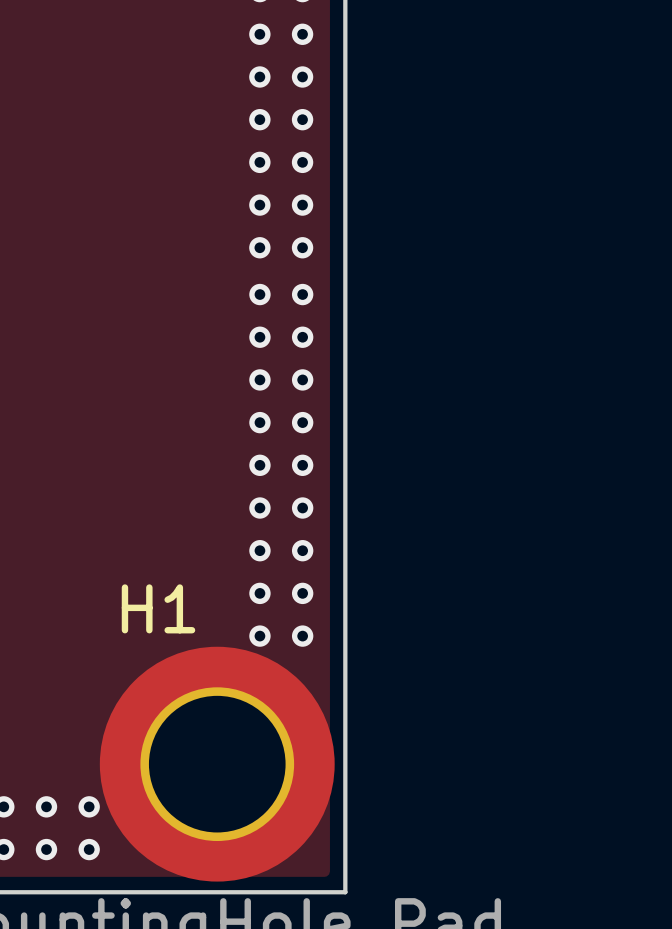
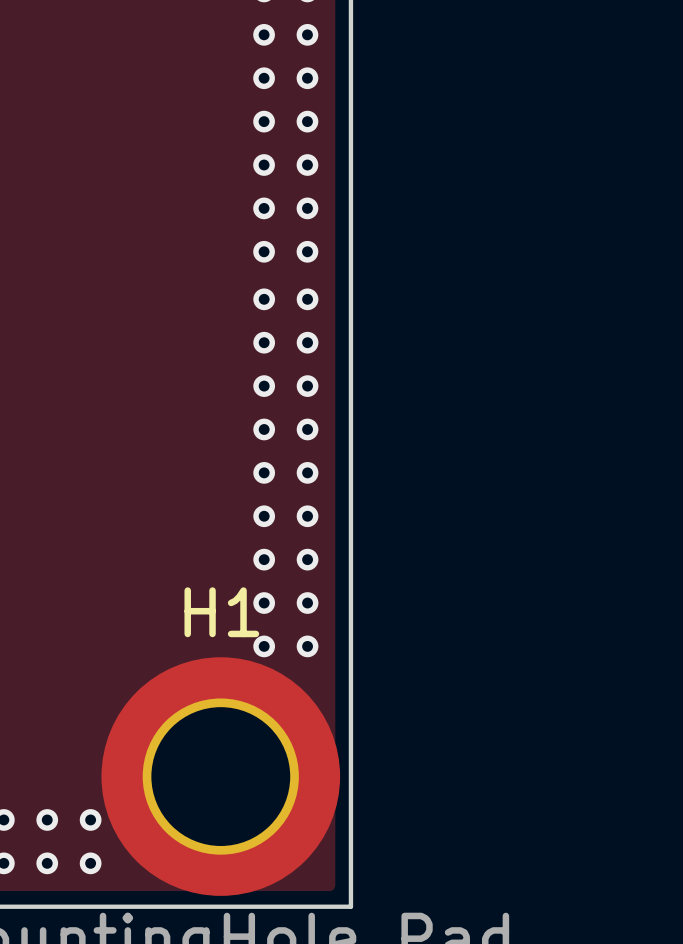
H1 name position: H1 (158, 608) -> H1 (221, 612)

